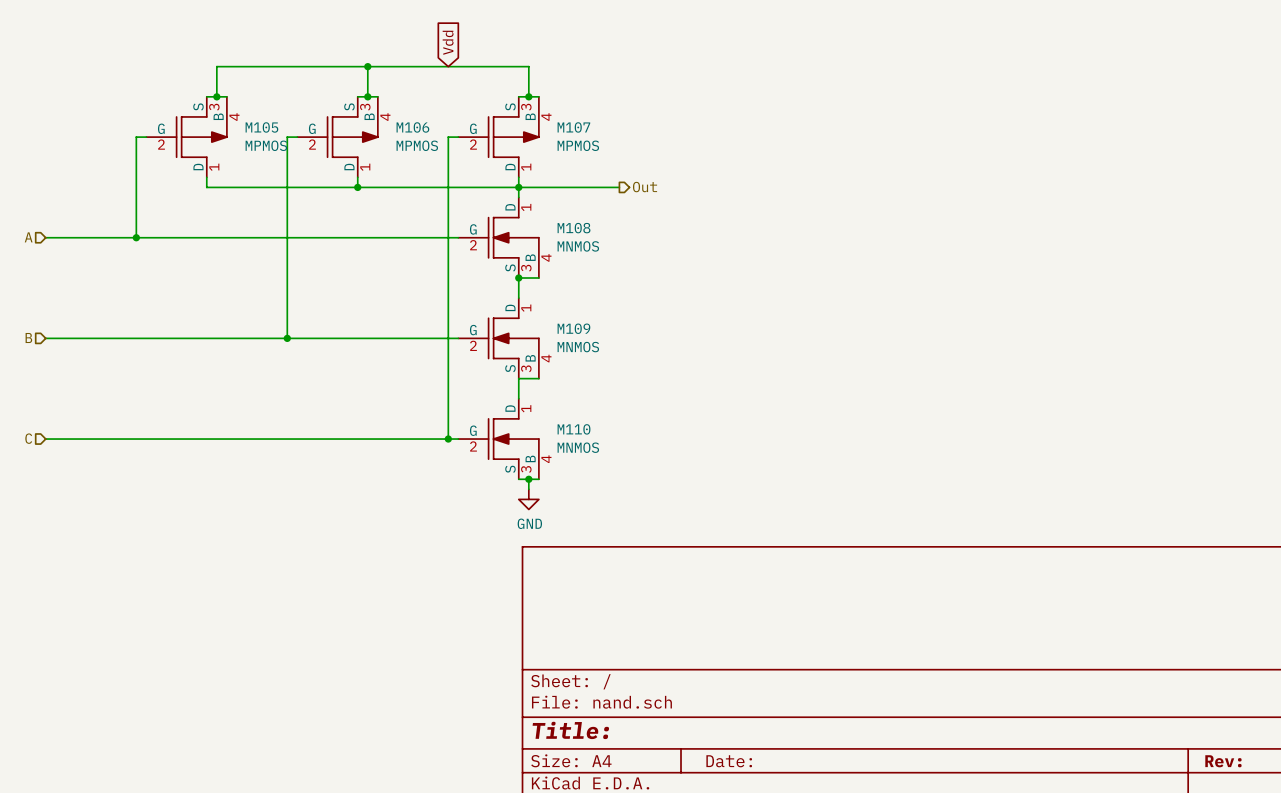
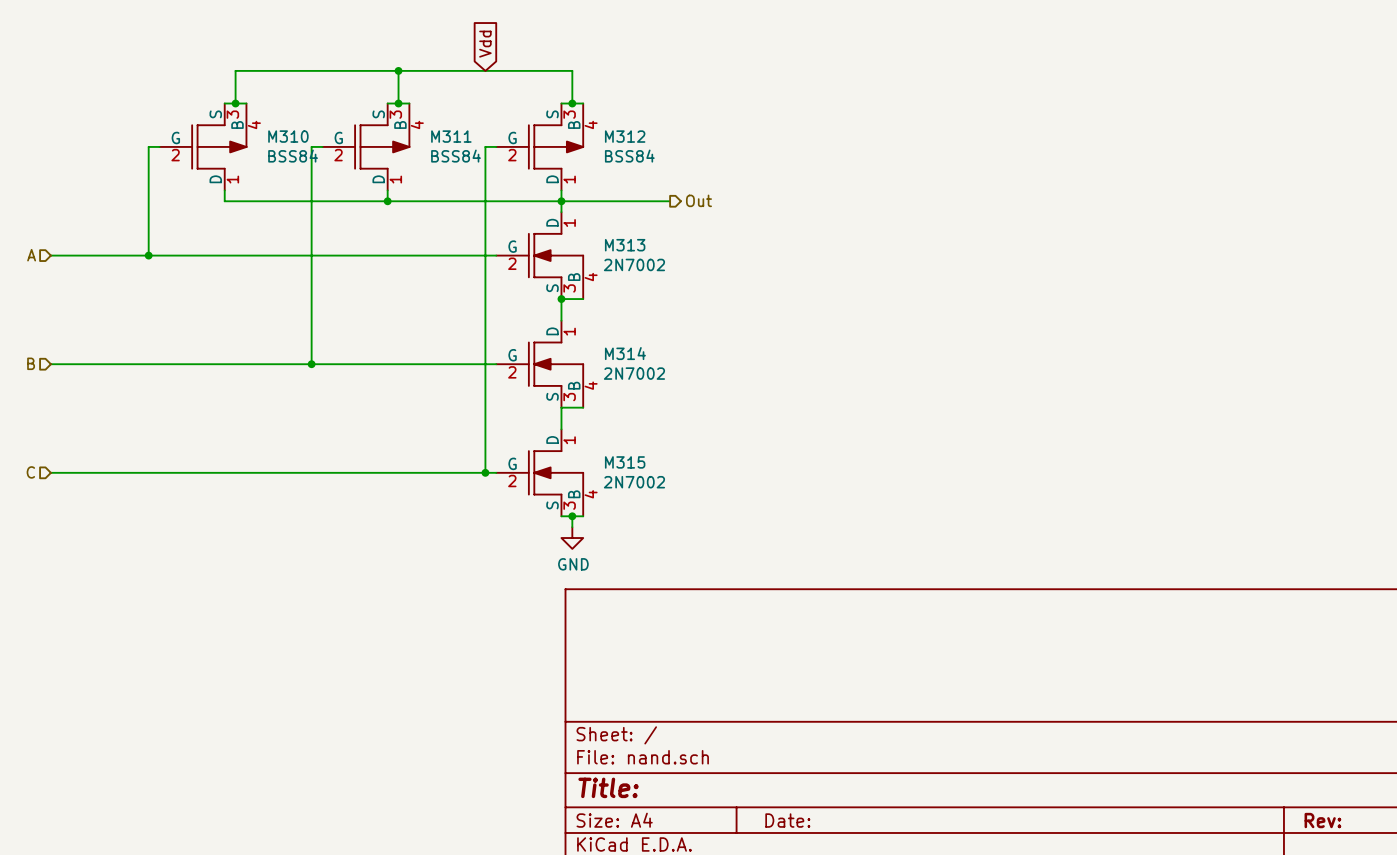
M105 name: M105 (261, 127) -> M310 (288, 136)
M106 name: M106 (412, 127) -> M311 (451, 136)
M107 name: M107 (573, 127) -> M312 (625, 136)
M105 value: MPMOS (266, 145) -> BSS84 (293, 156)
M106 value: MPMOS (417, 145) -> BSS84 (456, 156)
M107 value: MPMOS (578, 145) -> BSS84 (629, 156)
M108 name: M108 (574, 228) -> M313 (625, 245)
M108 value: MNMOS (578, 246) -> 2N7002 (634, 264)
M109 name: M109 (573, 328) -> M314 (625, 353)
M109 value: MNMOS (578, 347) -> 2N7002 (634, 373)
M110 name: M110 (574, 429) -> M315 (625, 462)
M110 value: MNMOS (578, 447) -> 2N7002 (634, 482)

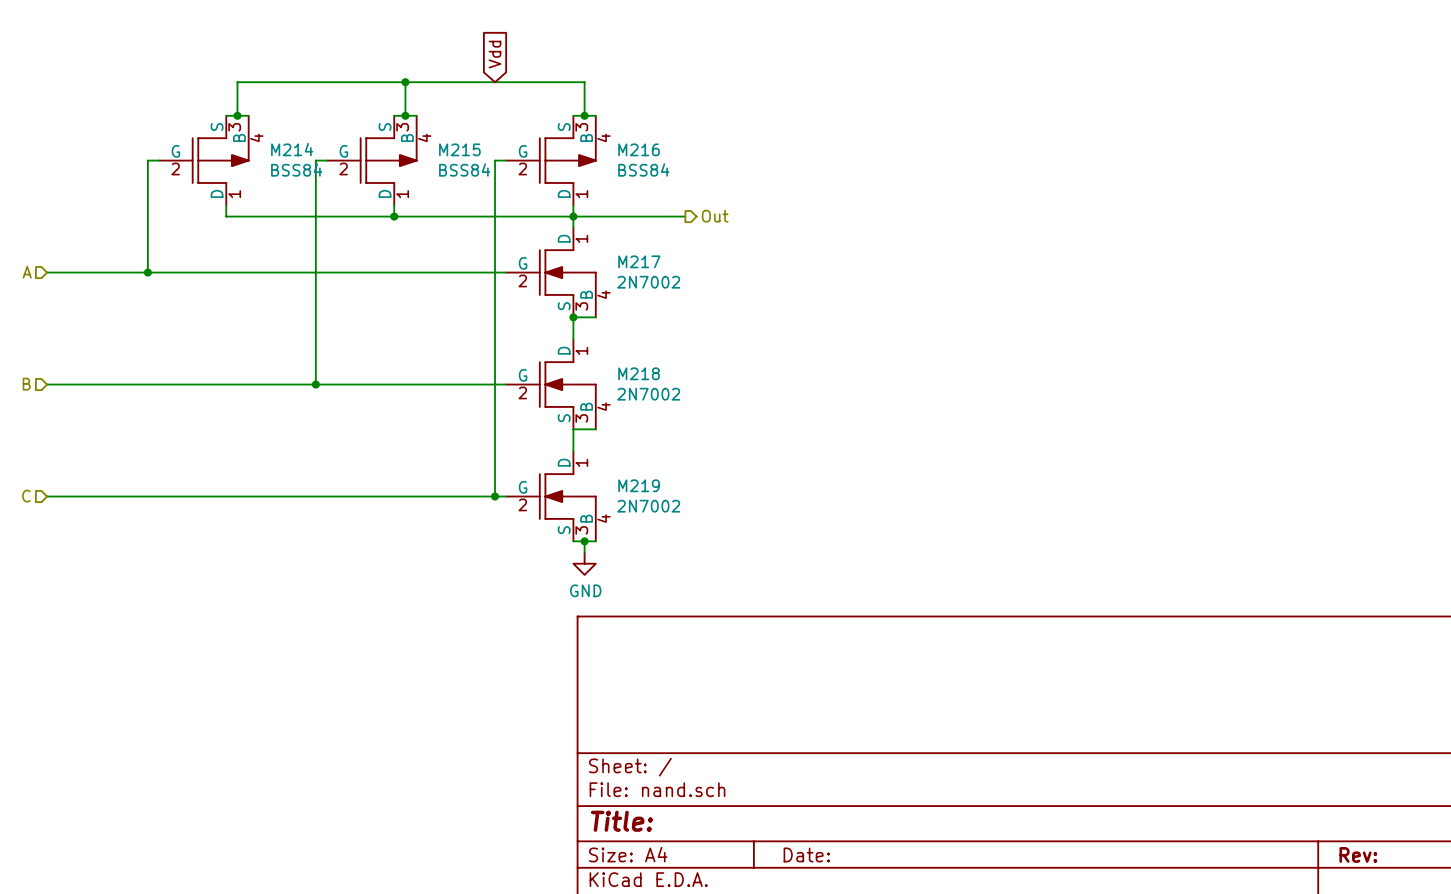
M310 name: M310 (288, 136) -> M214 (292, 149)
M311 name: M311 (451, 136) -> M215 (459, 149)
M312 name: M312 (625, 136) -> M216 (639, 149)
M313 name: M313 (625, 245) -> M217 (639, 261)
M314 name: M314 (625, 353) -> M218 (639, 373)
M315 name: M315 (625, 462) -> M219 (639, 485)

